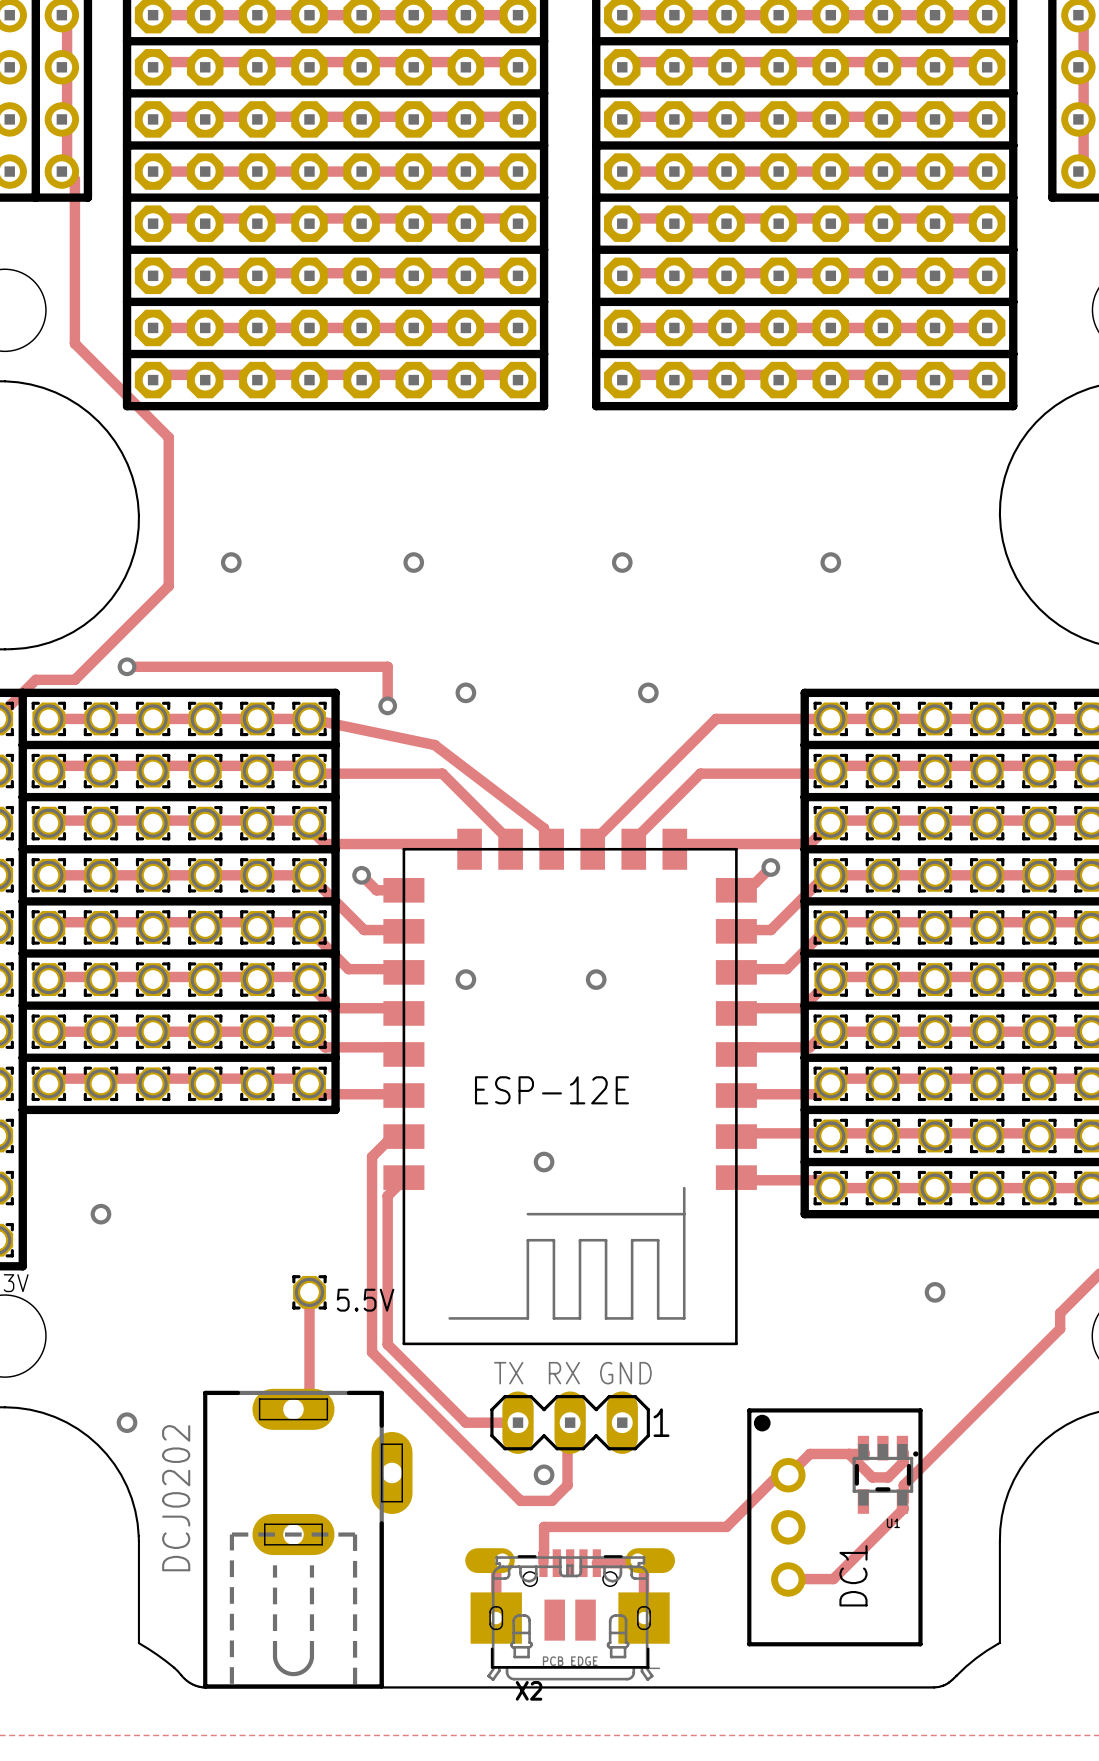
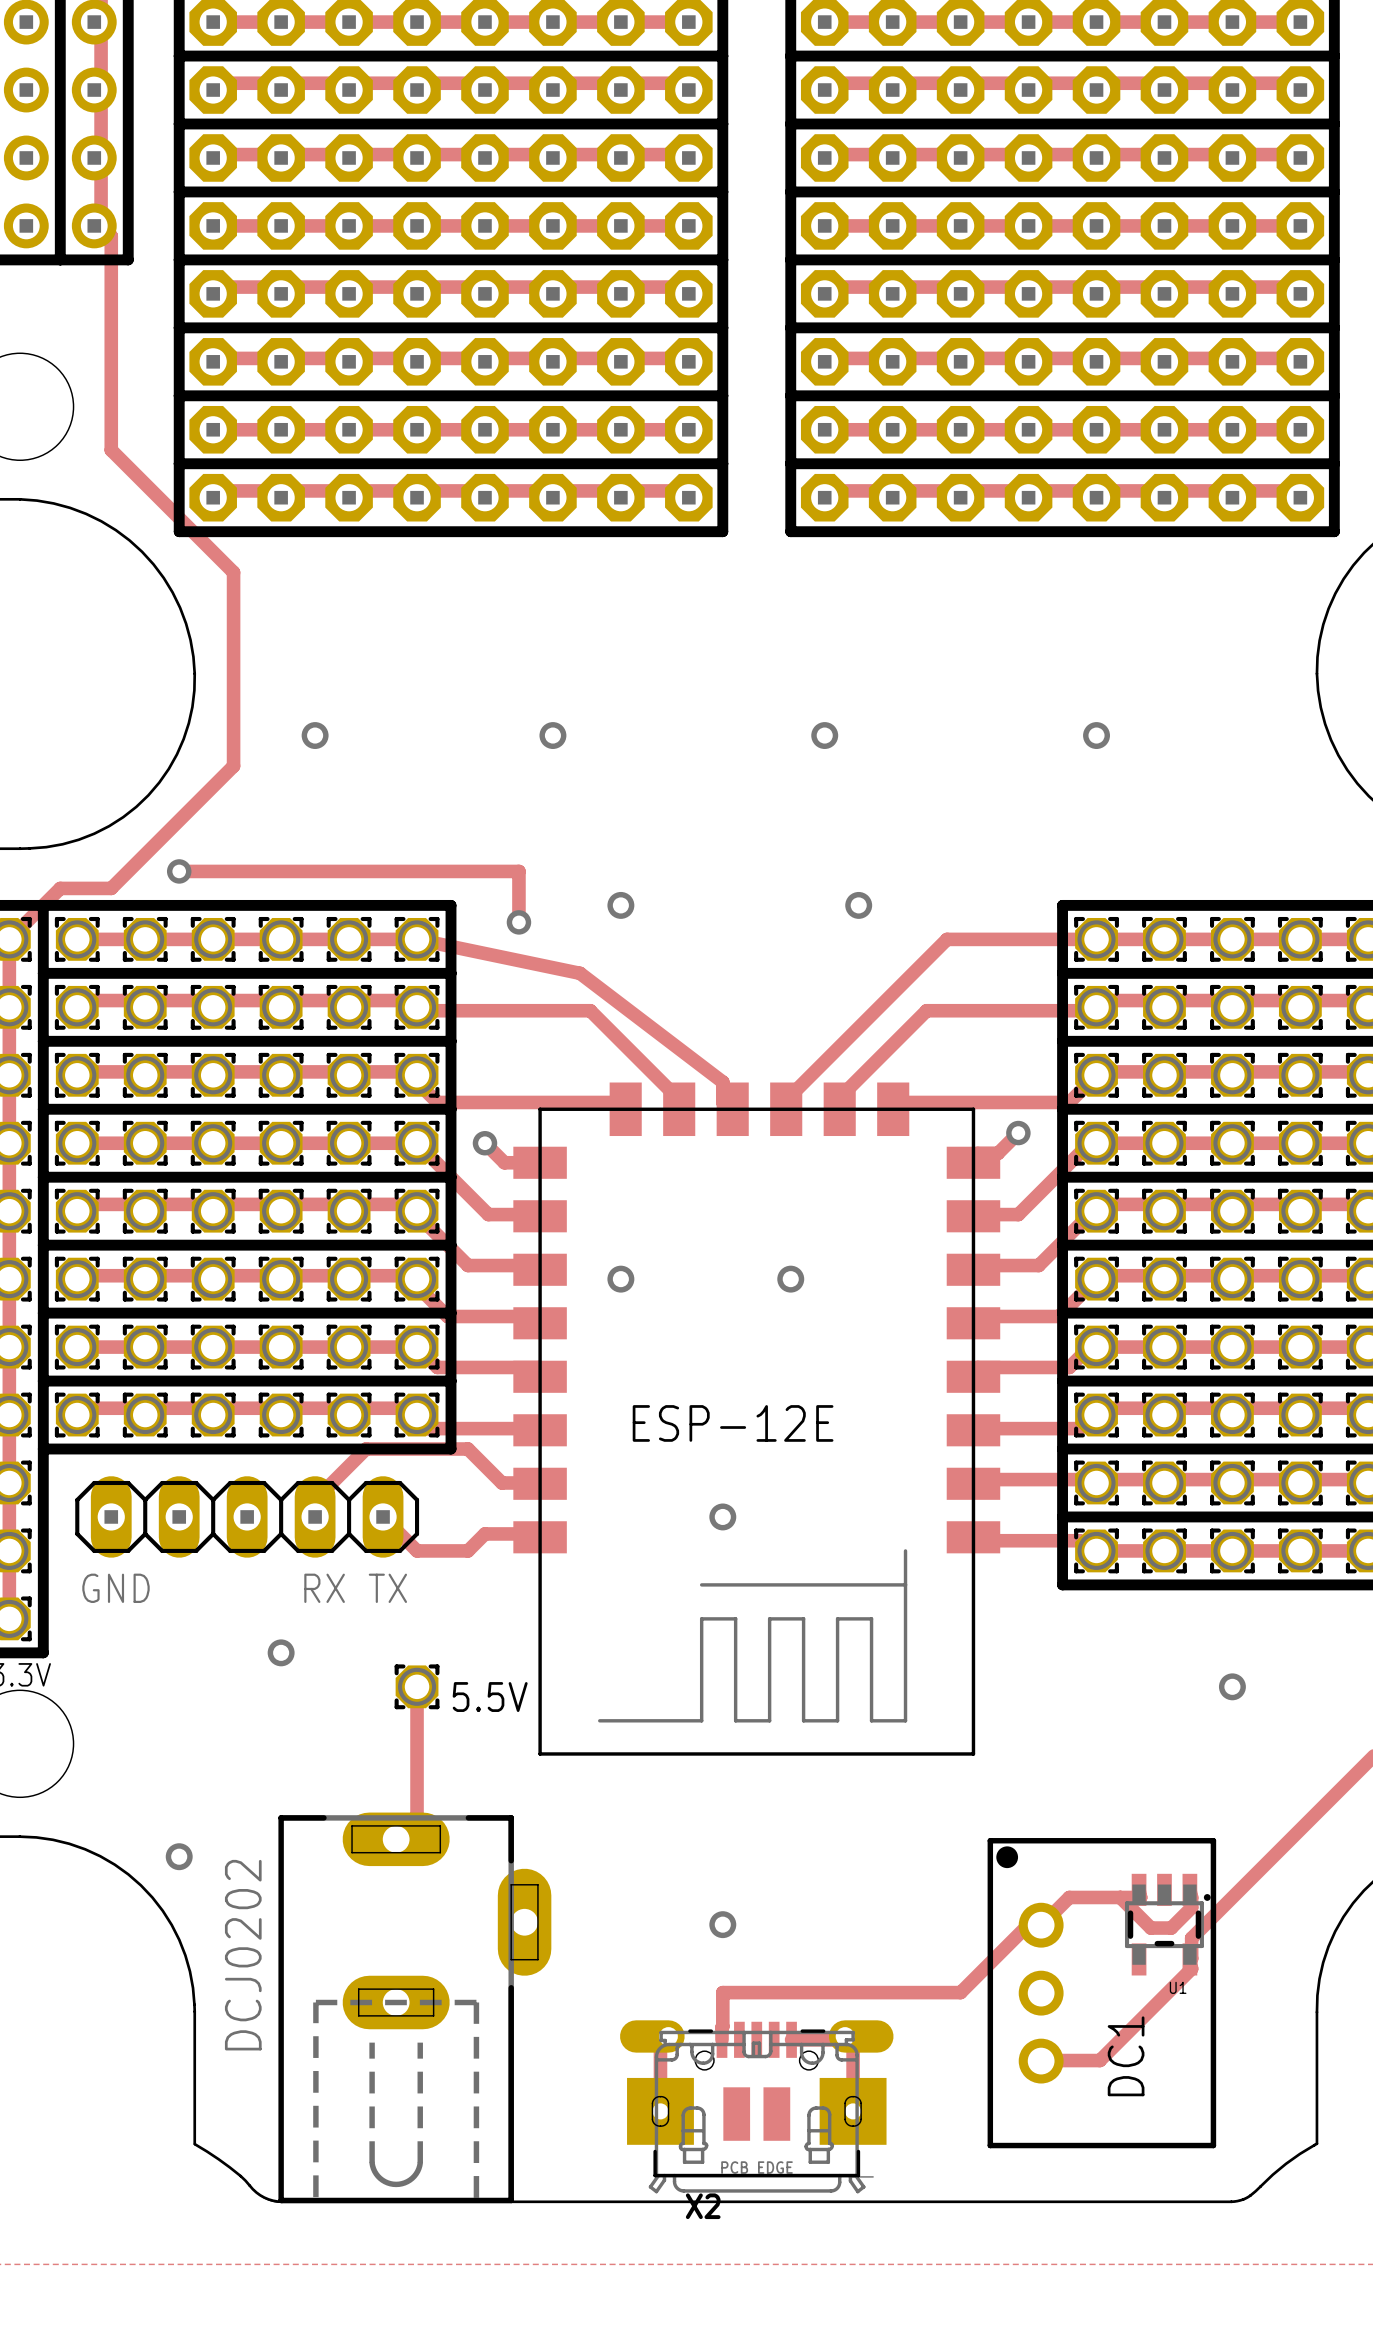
track: (403, 1136) (403, 1141) (387, 1141) (372, 1156) (372, 1352) (520, 1500) (551, 1500) (567, 1485) (567, 1422) (570, 1422) -> (540, 1483) (501, 1482) (467, 1449) (366, 1449) (315, 1499) (315, 1516)
part: none -> (247, 1516)
track: (403, 1177) (387, 1195) (387, 1344) (465, 1422) (518, 1422) -> (540, 1537) (536, 1533) (484, 1533) (467, 1550) (417, 1550) (383, 1516)
via position: (100, 1214) -> (281, 1652)
text: none -> GND (115, 1588)
text position: TX (508, 1373) -> TX (387, 1588)
text position: RX (564, 1373) -> RX (324, 1588)
text: GND (625, 1373) -> none
part: (570, 1422) -> none

